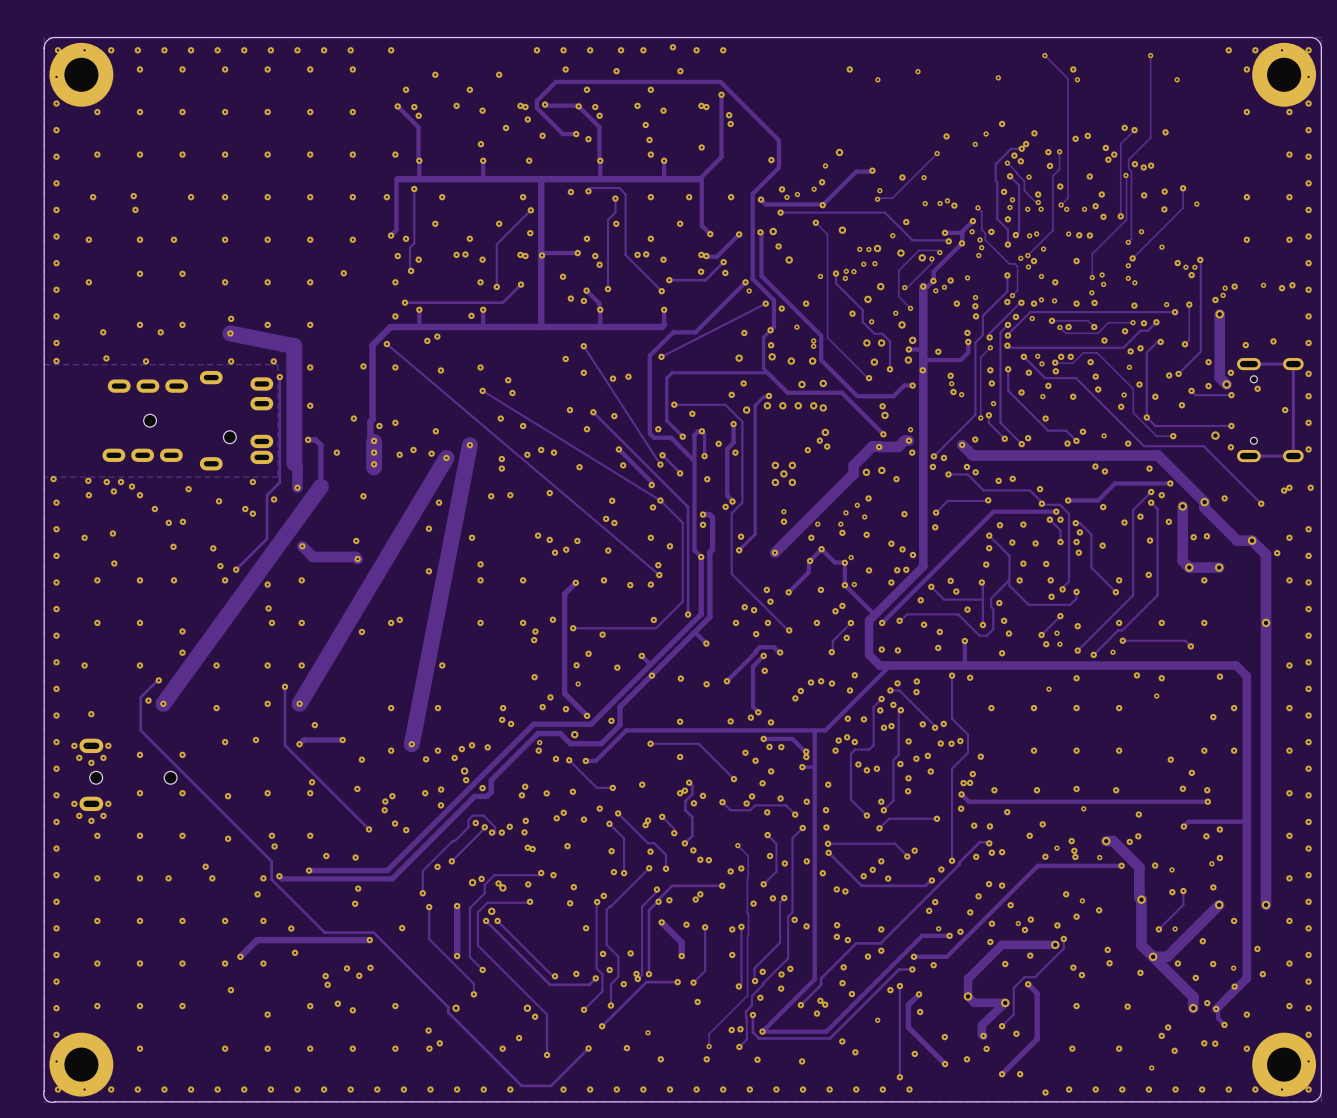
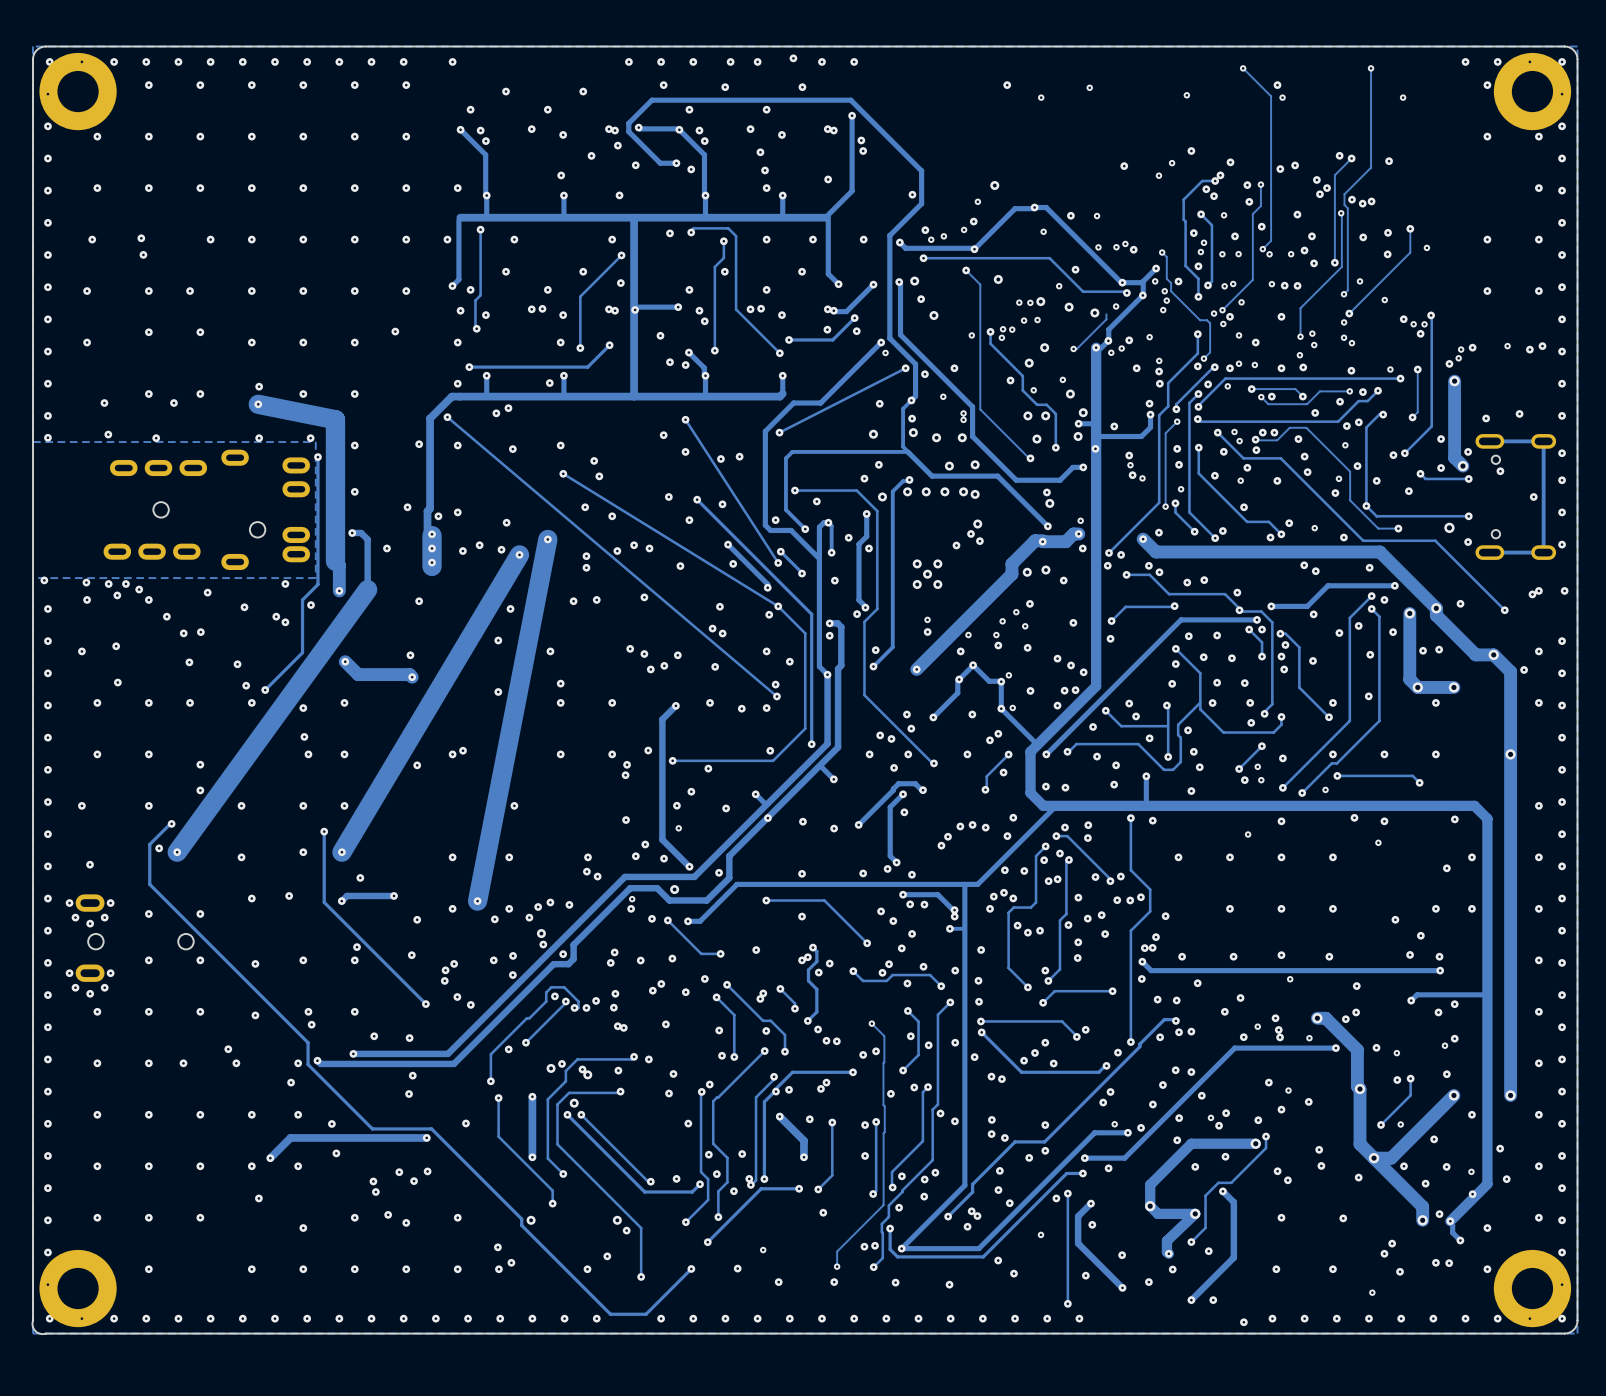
track: (937, 153) (892, 198) (877, 199) -> none
via: (937, 153) -> none
track: (1007, 163) (1024, 181) (1024, 190) (1037, 202) -> none
via: (1007, 163) -> none
track: none -> (1034, 207) (1046, 207) (1120, 282)
via: (877, 199) -> none
via: (1038, 202) -> none
track: (938, 251) (919, 250) (898, 270) (898, 296) (910, 308) -> none
via: (931, 258) -> none
via: (910, 308) -> none

